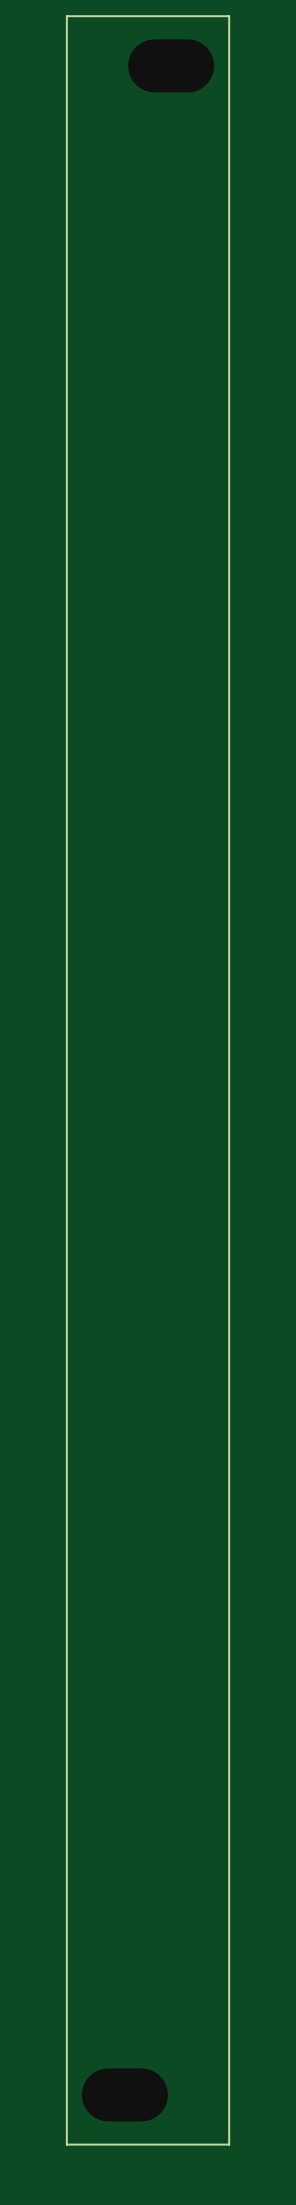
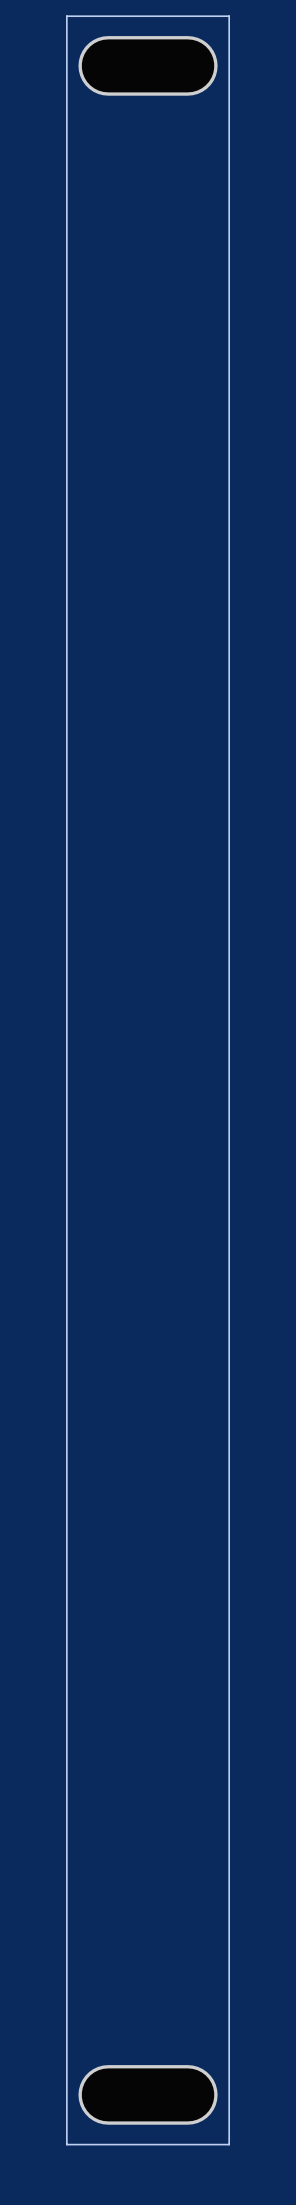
part: none -> (148, 65)
part: (171, 65) -> none
part: (124, 2094) -> none
part: none -> (148, 2094)

